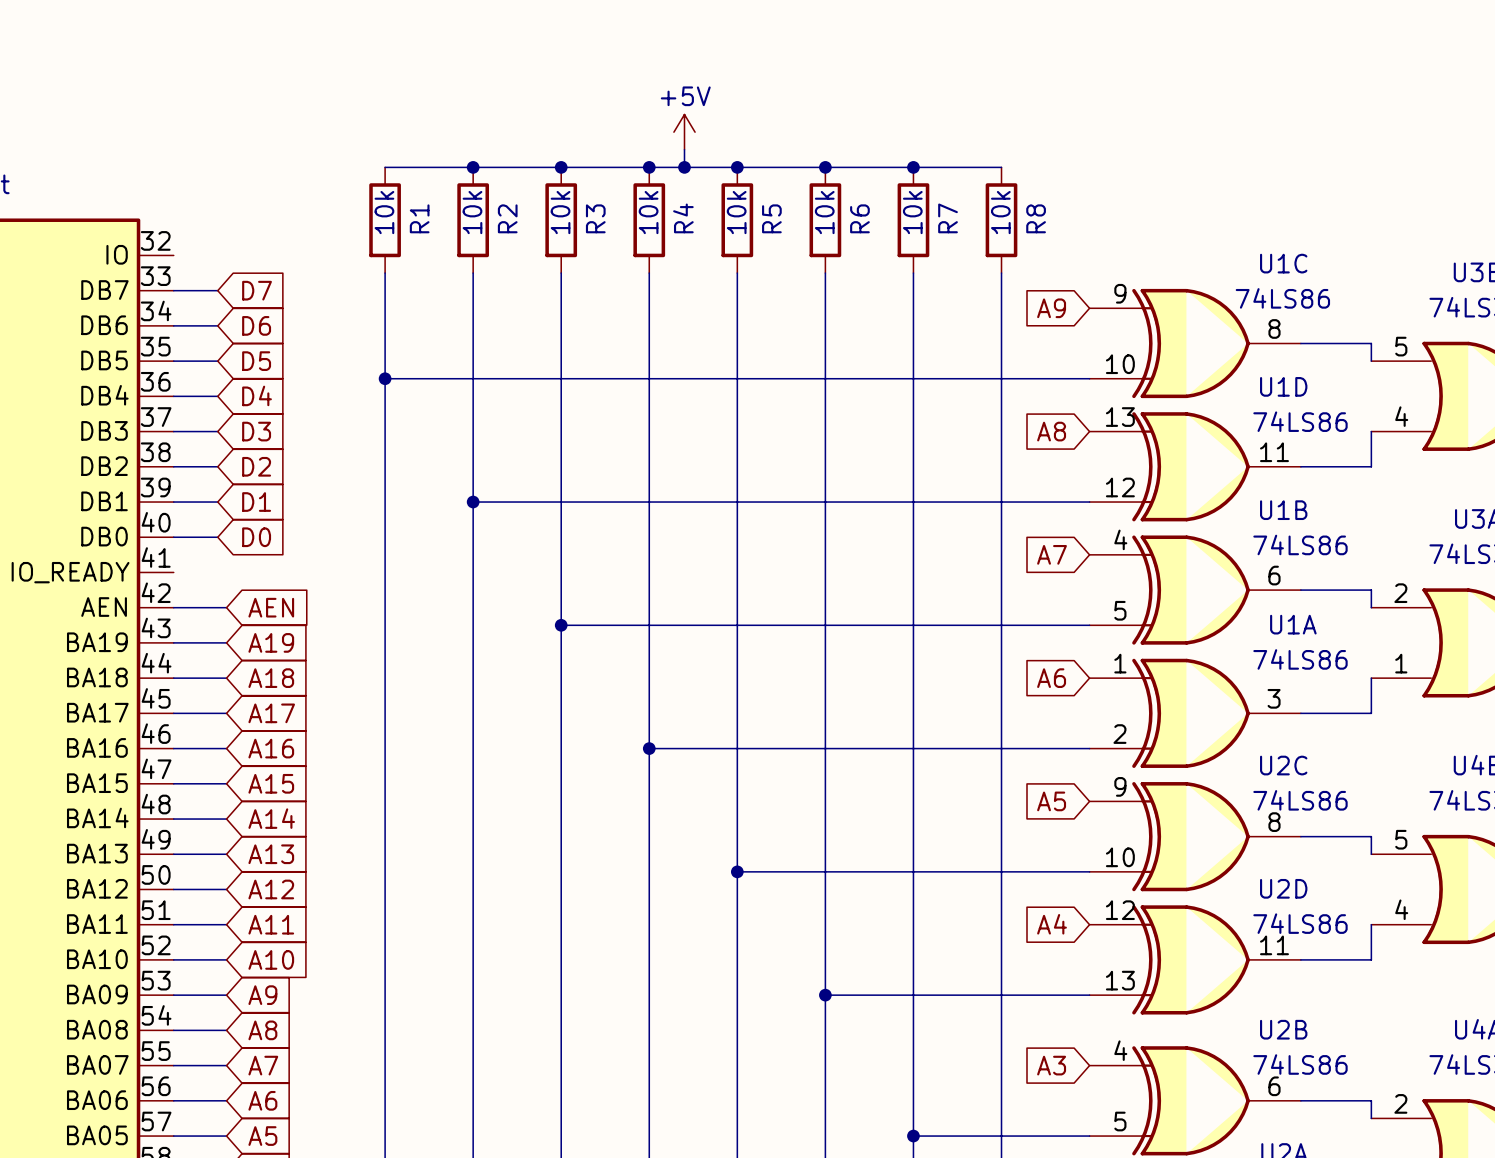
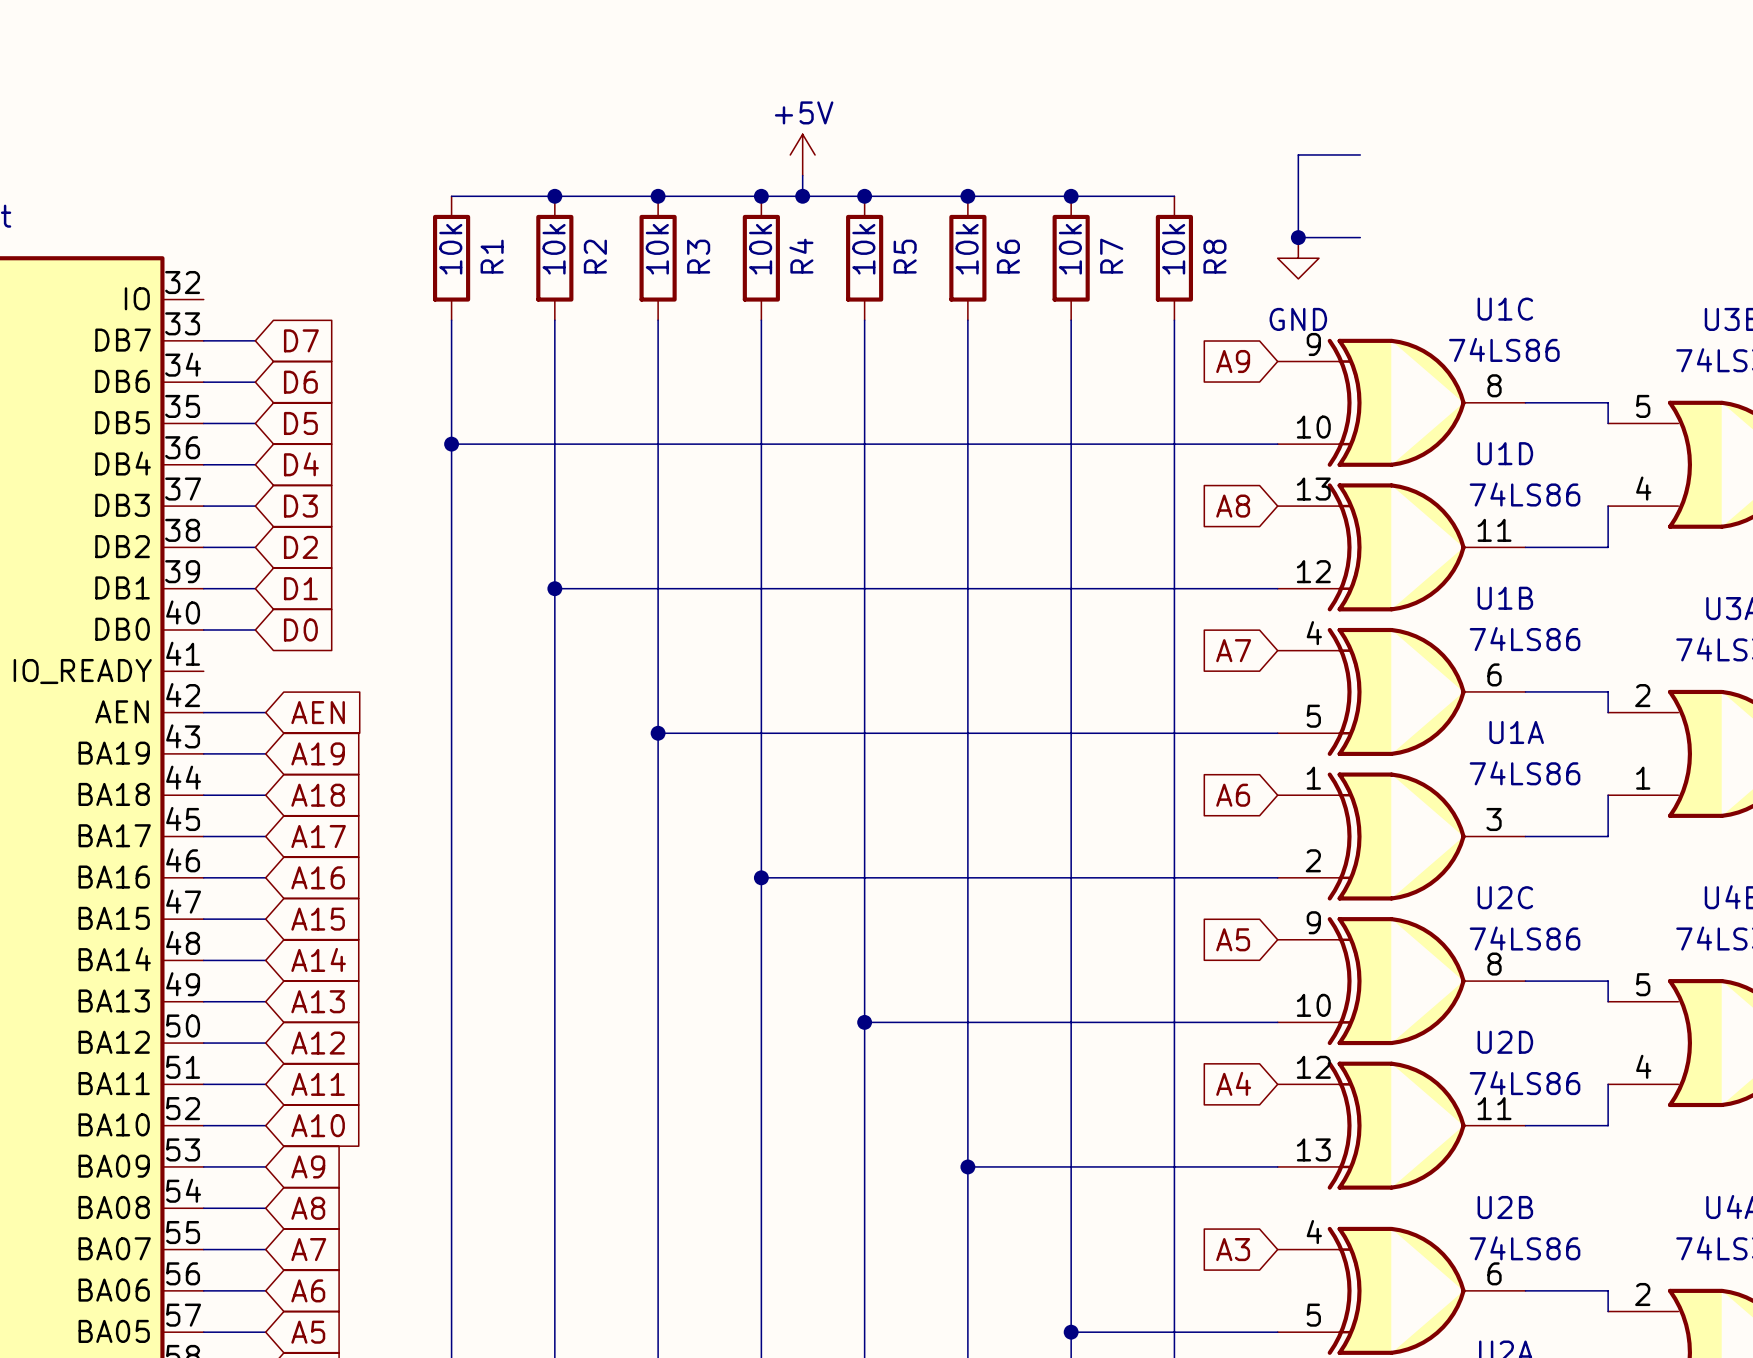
wire: none -> (1360, 154) (1298, 154) (1298, 237) (1360, 237)
junction: none -> (1298, 237)
power symbol: none -> GND (1298, 258)

